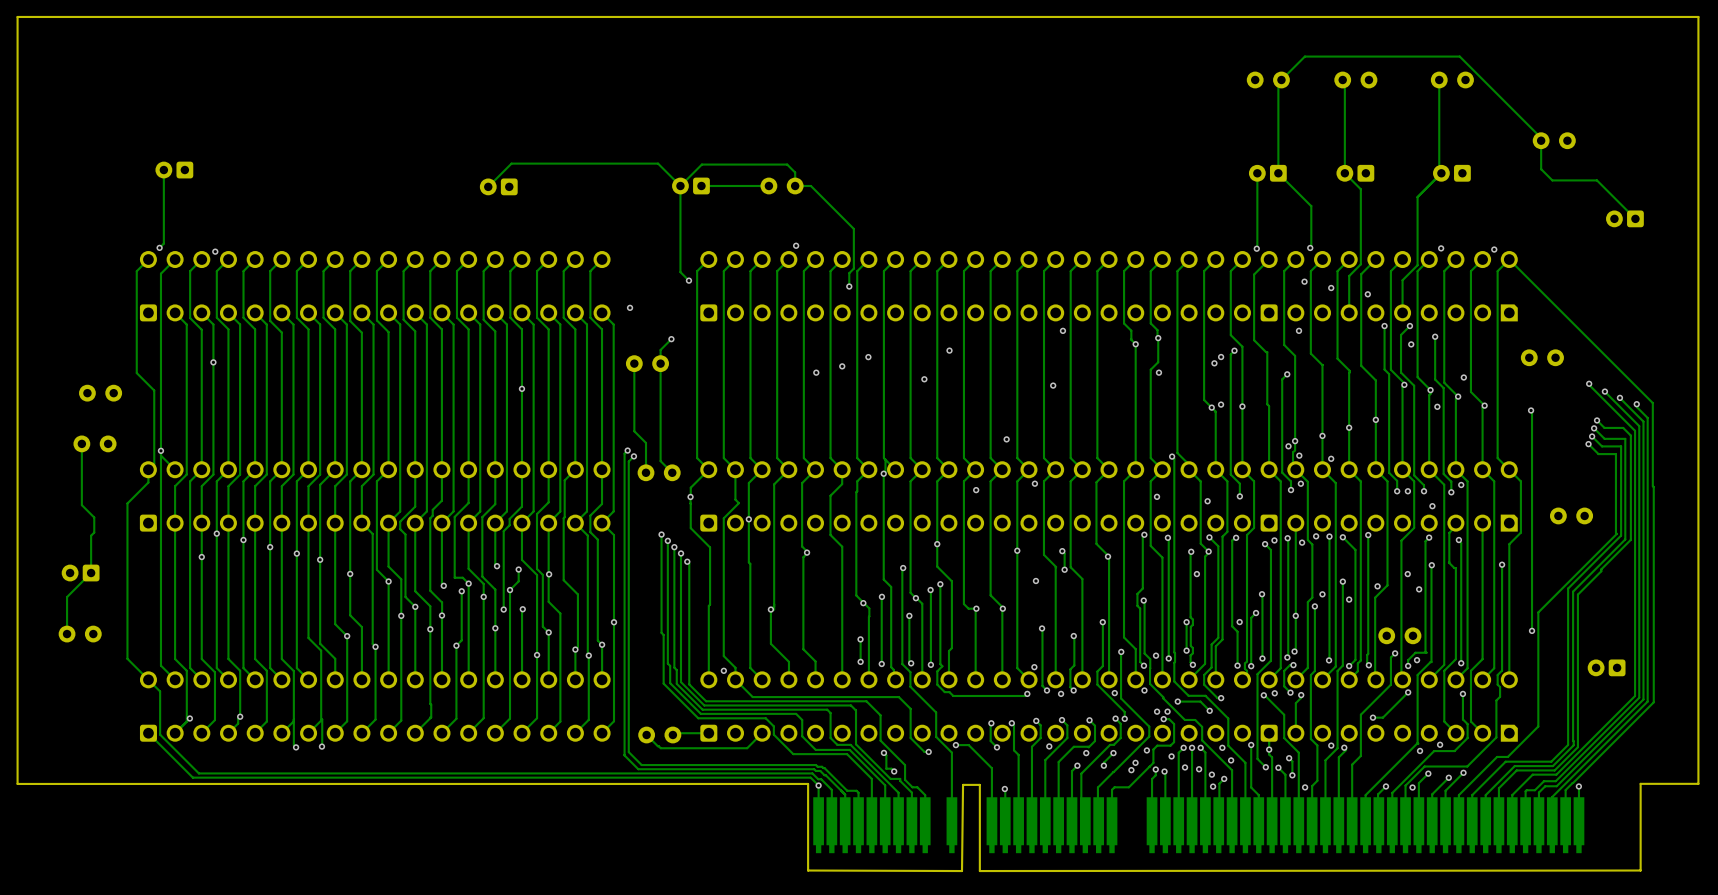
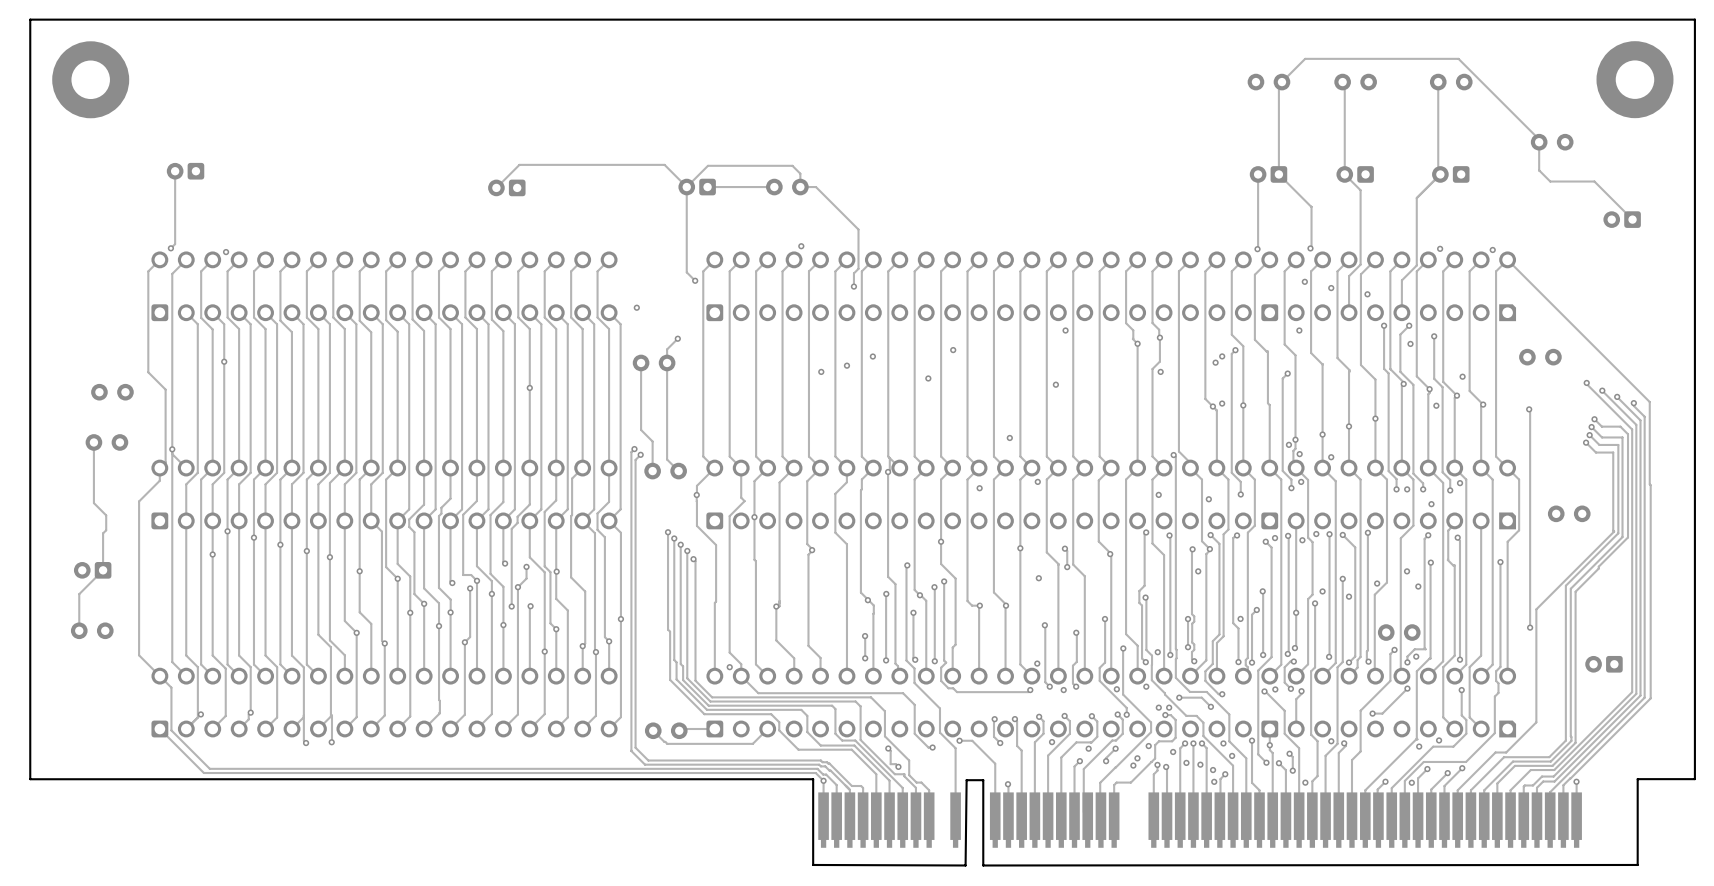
part: none -> (90, 79)
part: none -> (1634, 79)

